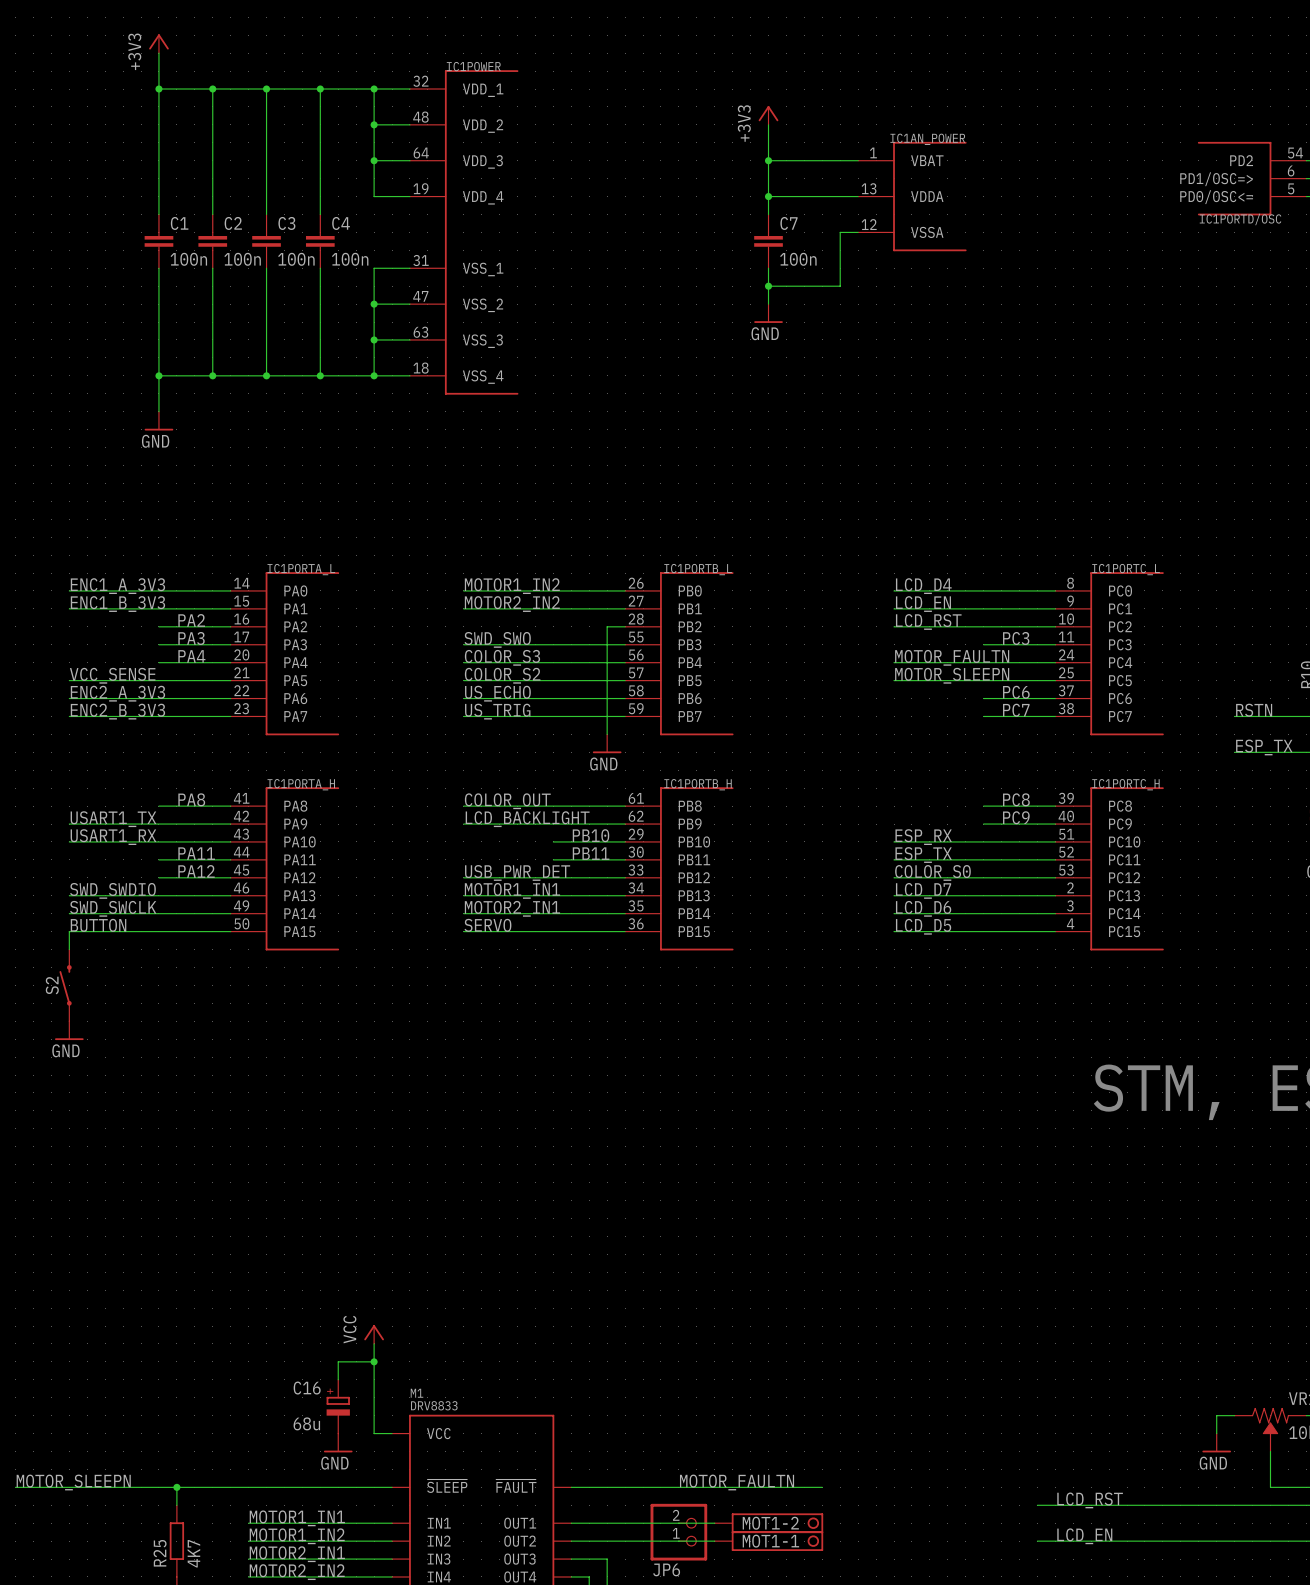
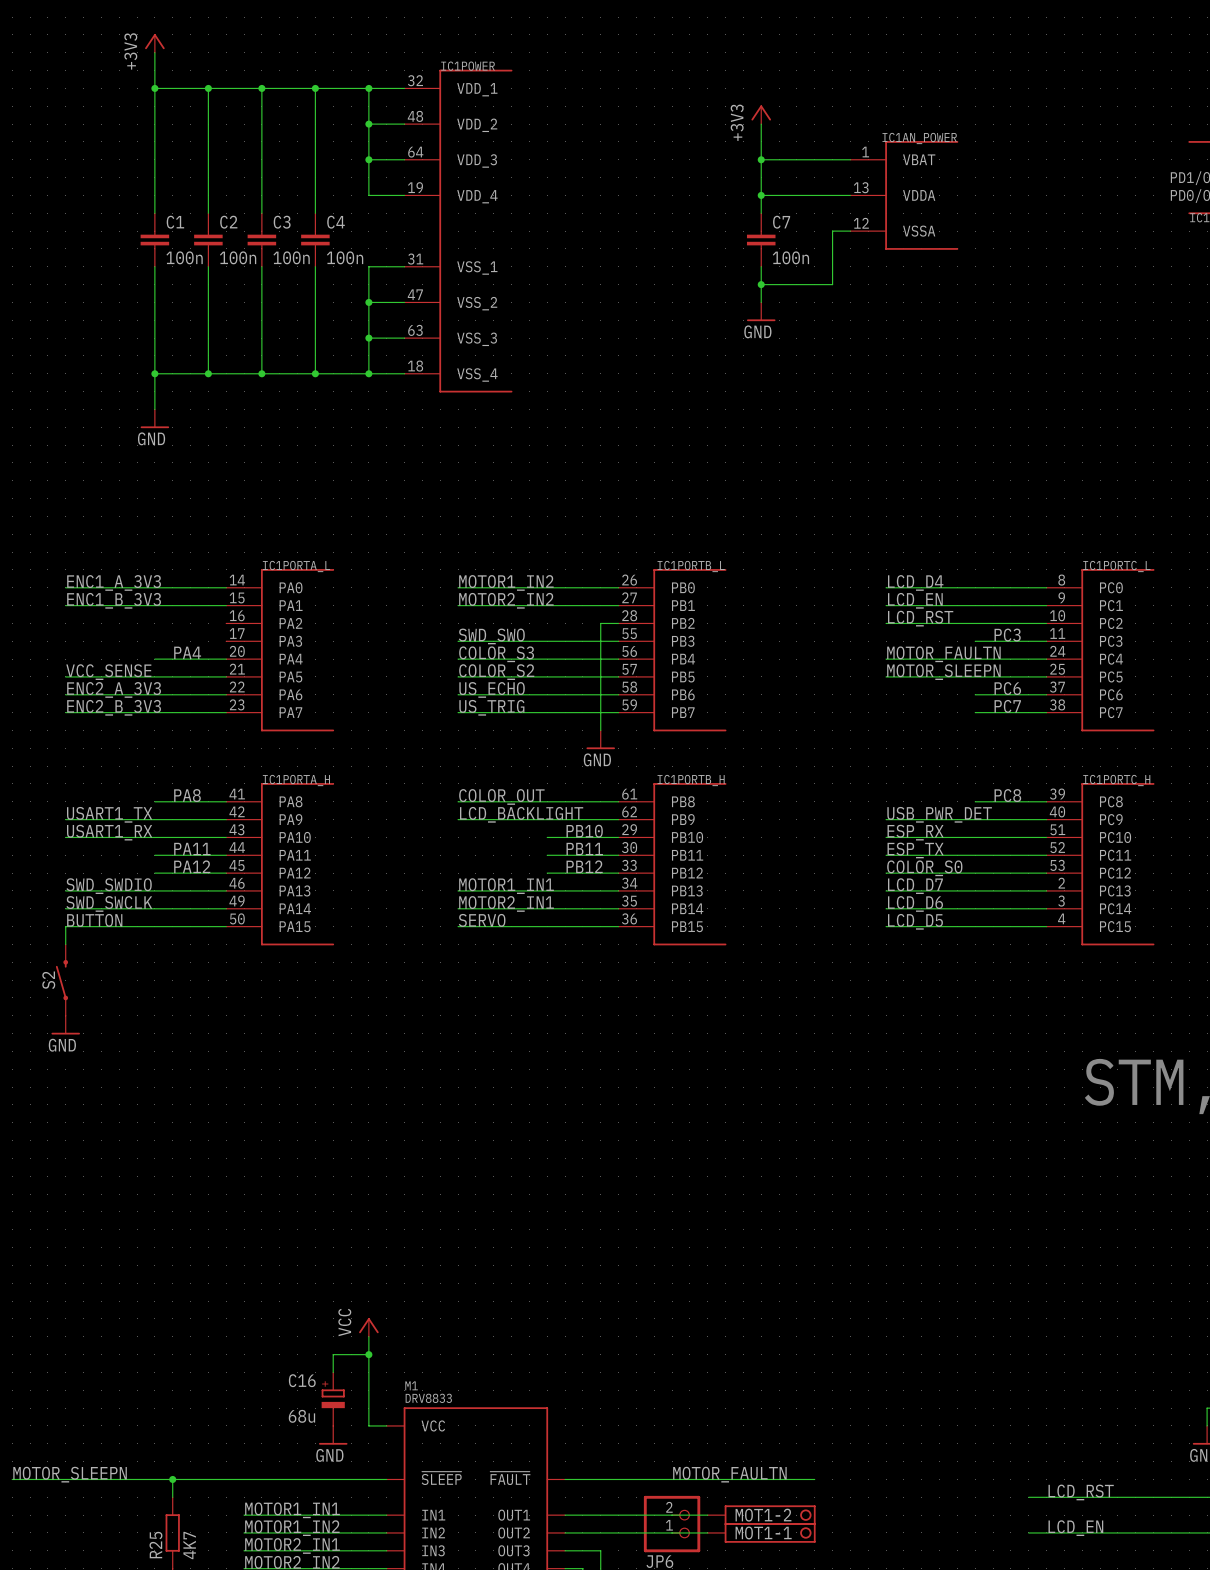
label: PA2 (191, 620) -> none
wire: (158, 626) (230, 626) -> none
label: PA3 (191, 638) -> none
wire: (158, 644) (230, 644) -> none
label: PC9 (1016, 817) -> none
label: none -> USB_PWR_DET (939, 814)
wire: none -> (886, 819) (975, 819)
label: none -> PB12 (584, 866)
label: USB_PWR_DET (517, 872) -> none
wire: (463, 877) (553, 877) -> none

